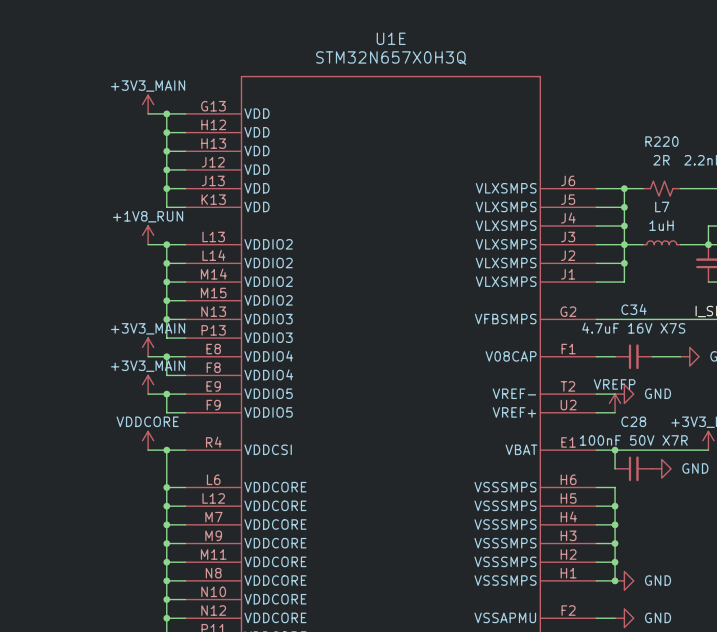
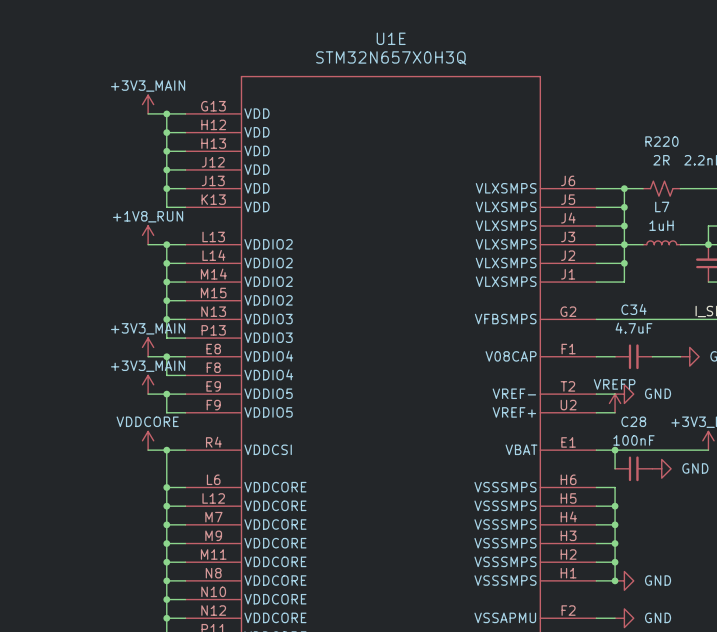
C34 value: 4.7uF 16V X7S (633, 328) -> 4.7uF (633, 328)
C28 value: 100nF 50V X7R (633, 440) -> 100nF (633, 440)

